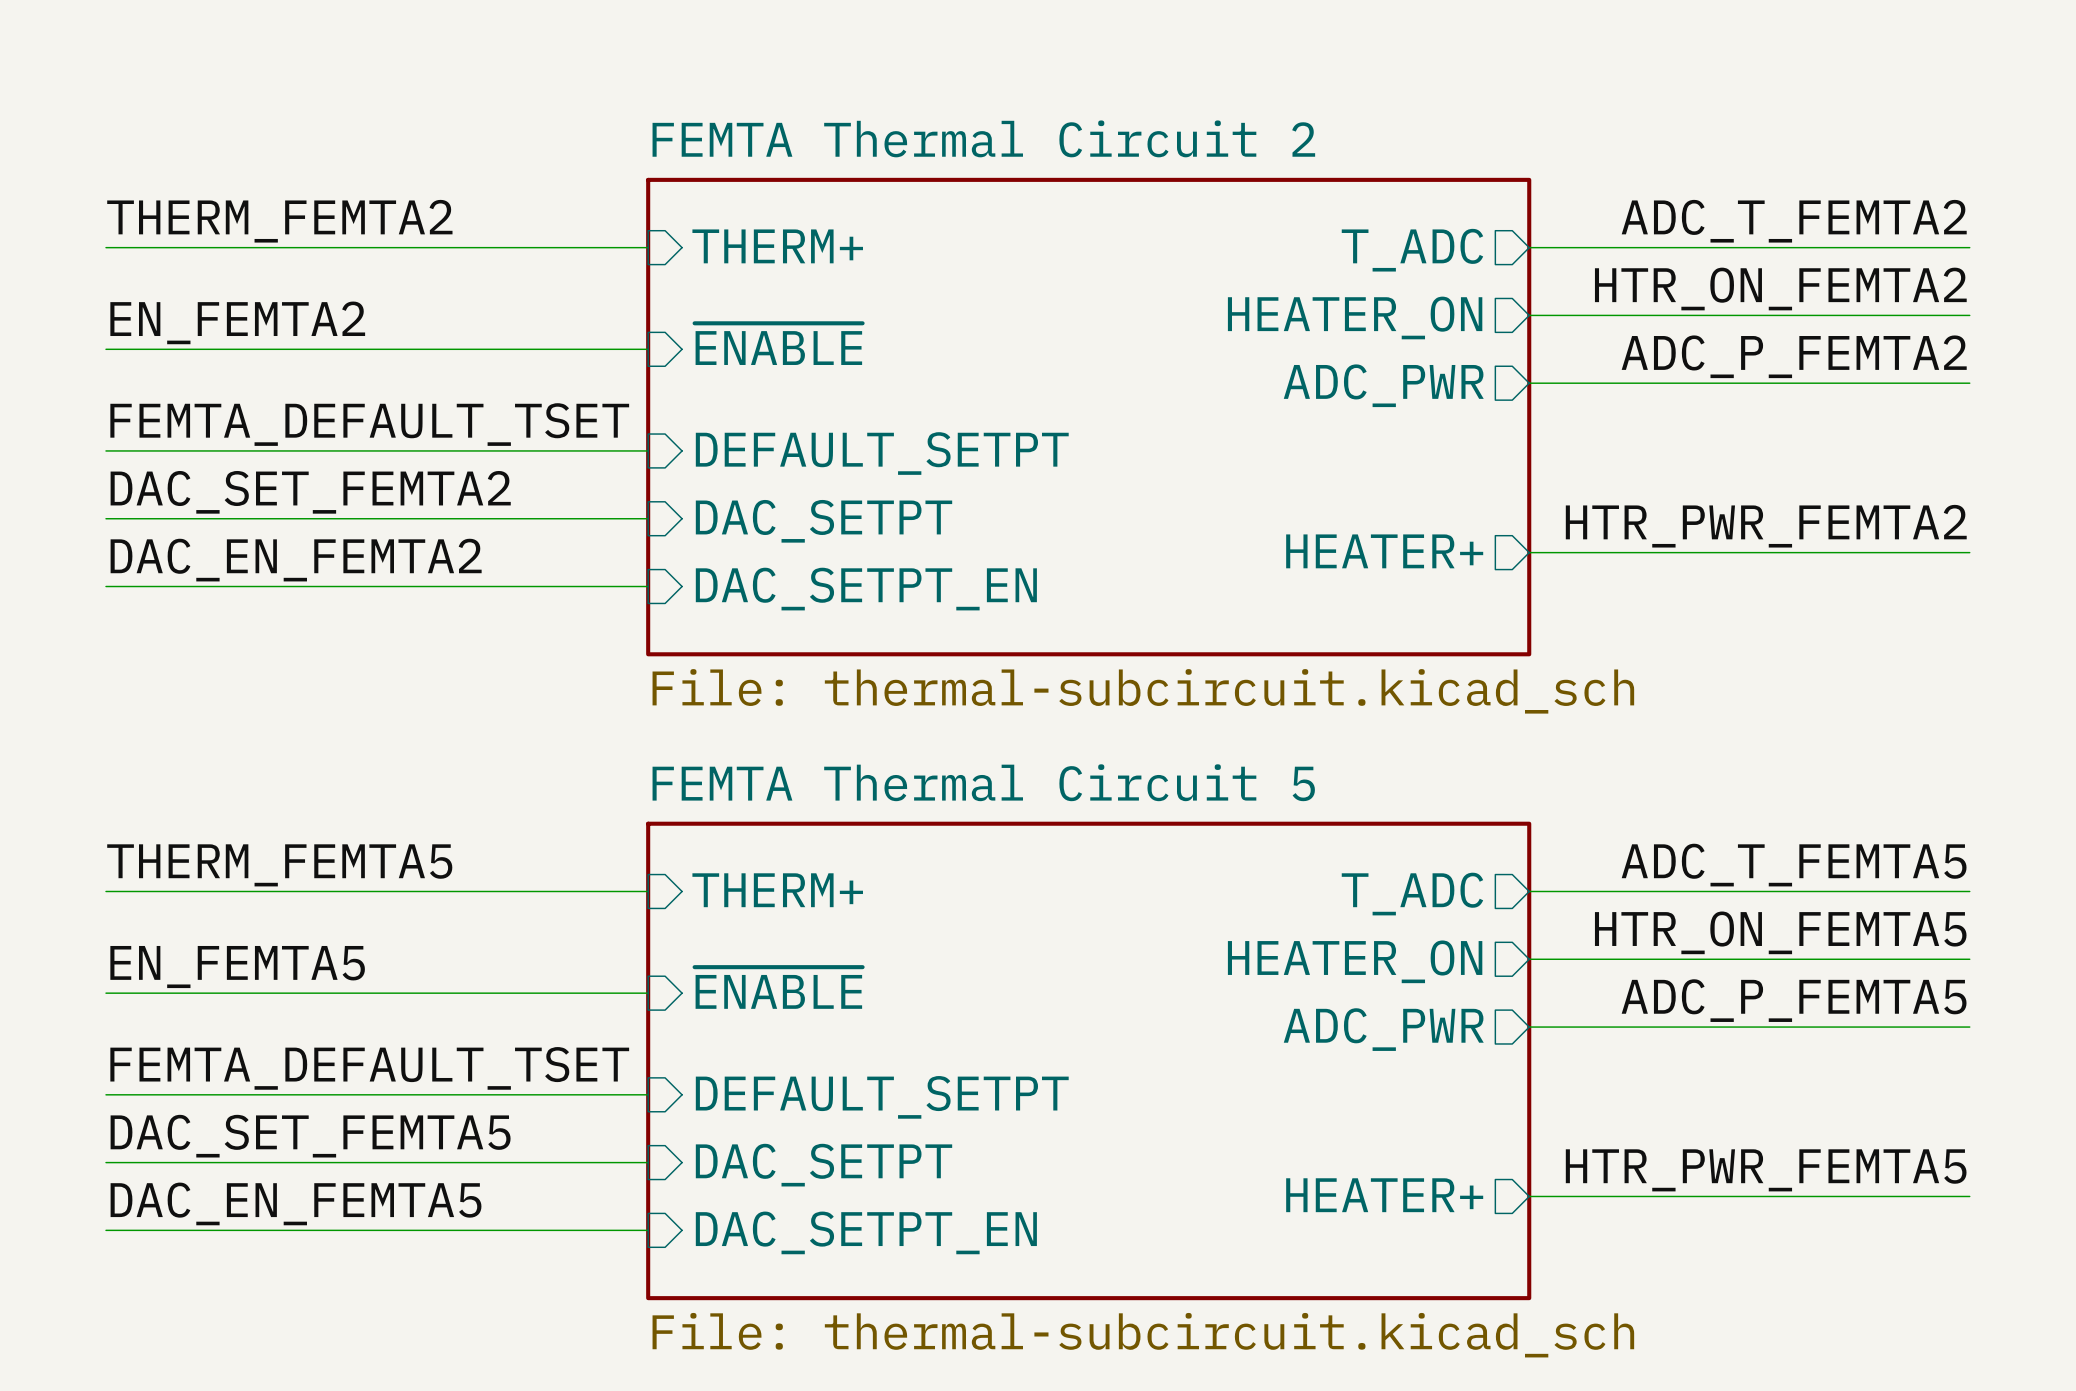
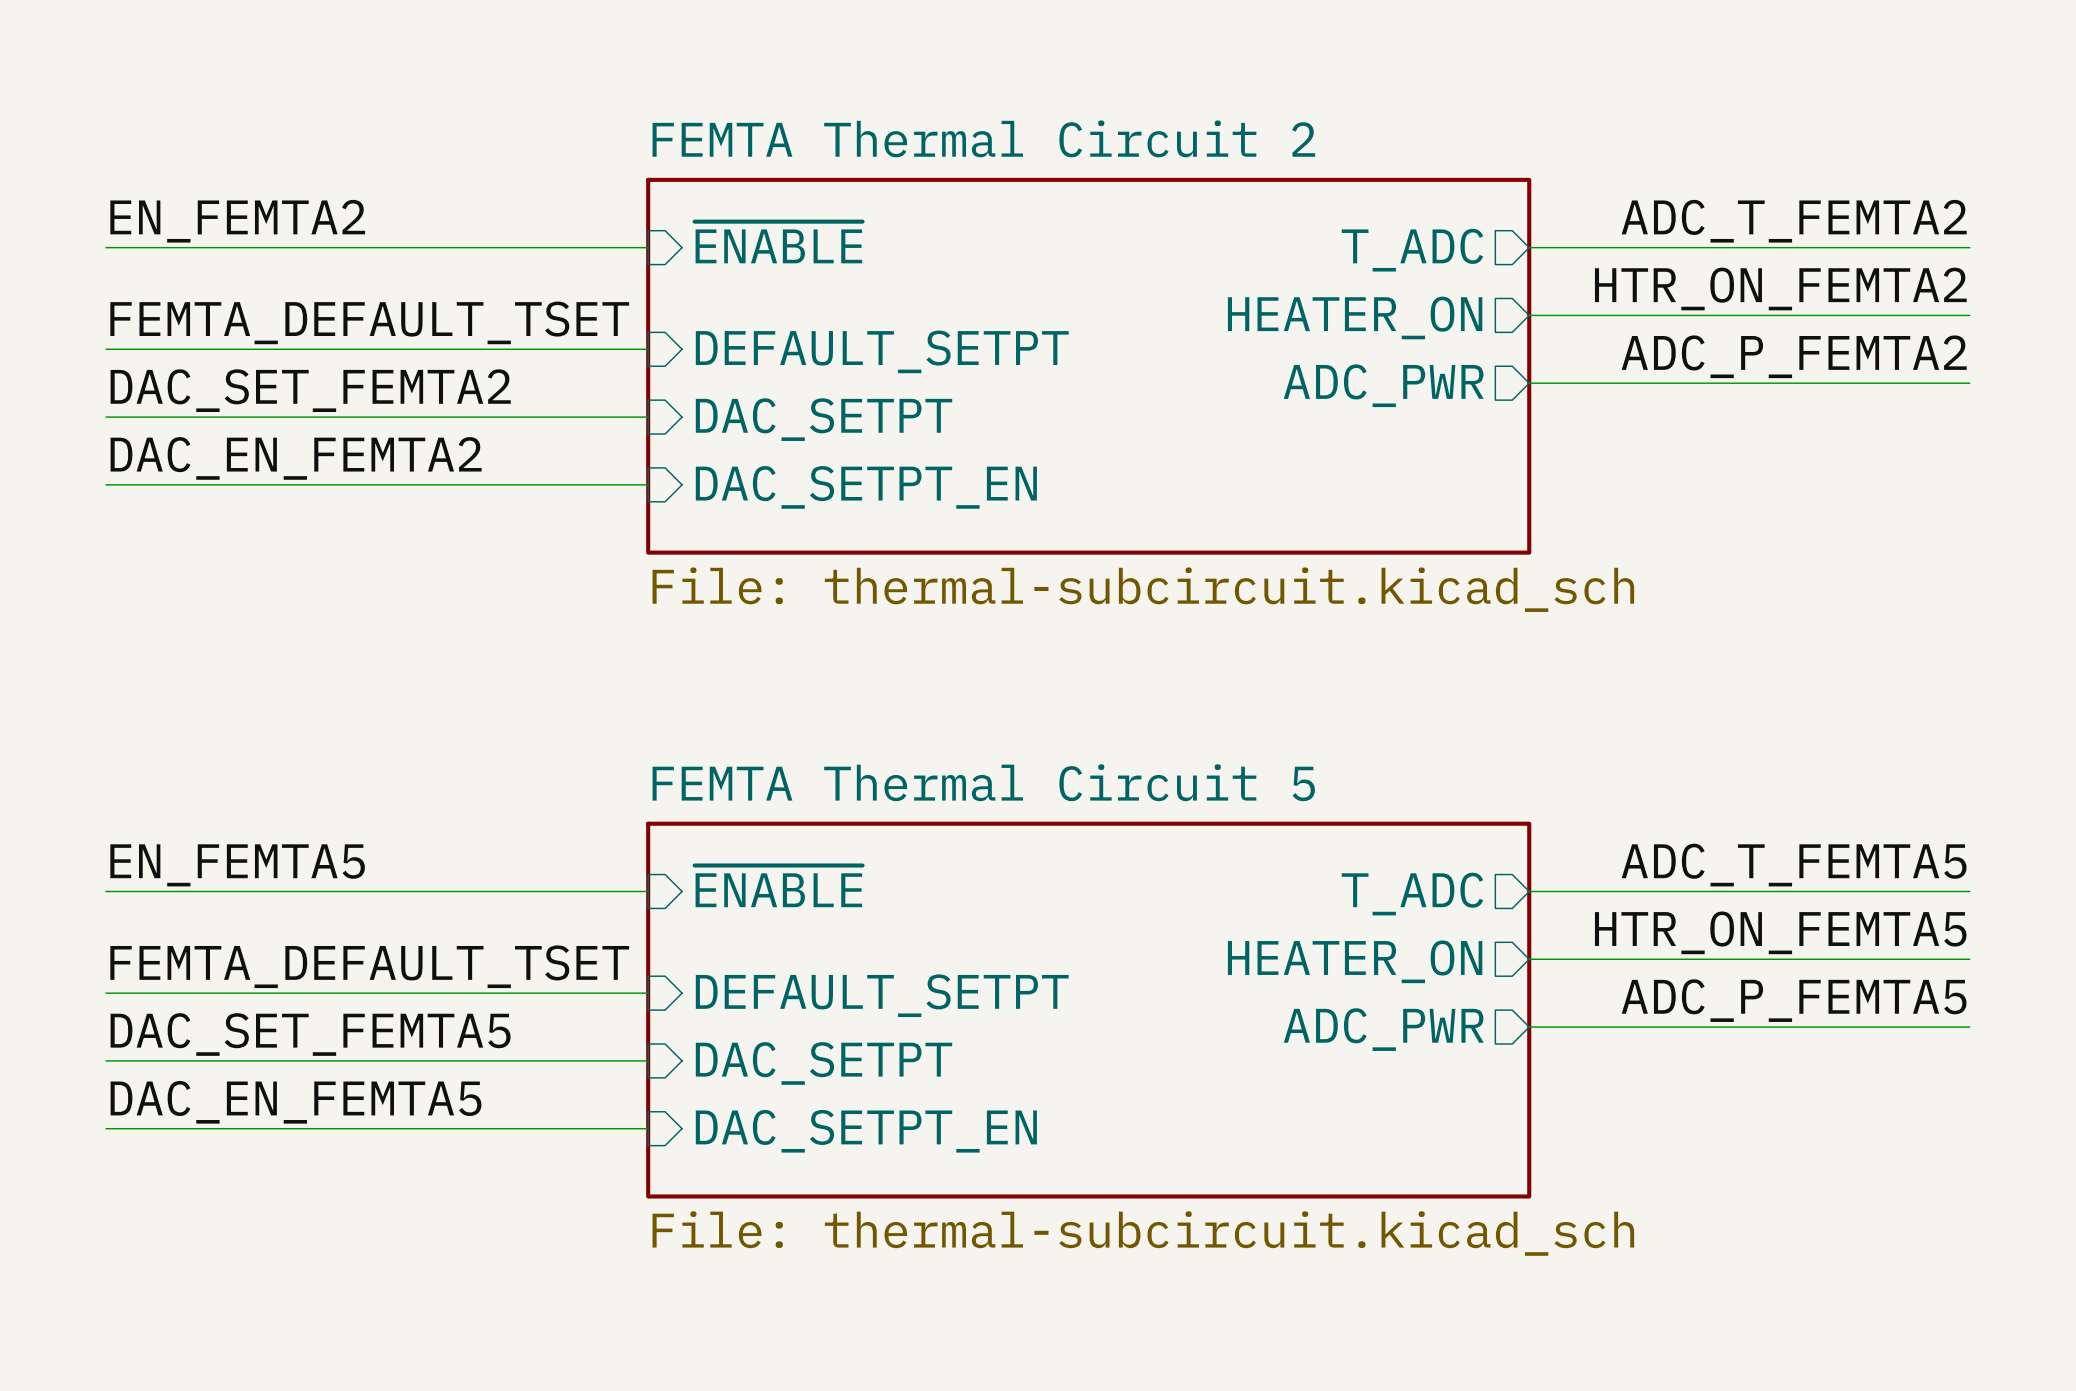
sheet FEMTA Thermal Circuit 2 shape: [646, 177, 1532, 657] -> [646, 177, 1532, 555]
label: THERM_FEMTA2 (279, 221) -> EN_FEMTA2 (237, 221)
sheet pin: THERM+ (777, 246) -> ~{ENABLE} (778, 242)
label: EN_FEMTA2 (237, 322) -> FEMTA_DEFAULT_TSET (369, 322)
sheet pin: ~{ENABLE} (778, 344) -> DEFAULT_SETPT (882, 351)
label: FEMTA_DEFAULT_TSET (369, 424) -> none
wire: (105, 450) (648, 450) -> (105, 417) (648, 417)
sheet pin: DEFAULT_SETPT (882, 453) -> none
label position: DAC_SET_FEMTA2 (310, 492) -> DAC_SET_FEMTA2 (310, 390)
wire: (105, 518) (648, 518) -> (105, 484) (648, 484)
sheet pin position: DAC_SETPT (824, 521) -> DAC_SETPT (824, 419)
label: HTR_PWR_FEMTA2 (1766, 526) -> none
sheet pin: HEATER+ (1384, 551) -> none
wire: (1529, 552) (1969, 552) -> none
label position: DAC_EN_FEMTA2 (296, 560) -> DAC_EN_FEMTA2 (296, 458)
wire: (105, 586) (648, 586) -> none
sheet pin position: DAC_SETPT_EN (866, 589) -> DAC_SETPT_EN (866, 487)
sheet FEMTA Thermal Circuit 5 shape: [646, 821, 1532, 1301] -> [646, 821, 1532, 1199]
label: THERM_FEMTA5 (279, 865) -> EN_FEMTA5 (237, 865)
sheet pin: THERM+ (777, 890) -> ~{ENABLE} (778, 886)
label: EN_FEMTA5 (237, 967) -> FEMTA_DEFAULT_TSET (369, 966)
sheet pin: ~{ENABLE} (778, 987) -> DEFAULT_SETPT (882, 995)
label: FEMTA_DEFAULT_TSET (369, 1068) -> none
wire: (105, 1094) (648, 1094) -> (105, 1060) (648, 1060)
sheet pin: DEFAULT_SETPT (882, 1097) -> none
label position: DAC_SET_FEMTA5 (310, 1136) -> DAC_SET_FEMTA5 (310, 1034)
wire: (105, 1162) (648, 1162) -> (105, 1128) (648, 1128)
sheet pin position: DAC_SETPT (824, 1165) -> DAC_SETPT (824, 1063)
label: HTR_PWR_FEMTA5 (1766, 1170) -> none
sheet pin: HEATER+ (1384, 1195) -> none
wire: (1529, 1196) (1969, 1196) -> none
label position: DAC_EN_FEMTA5 (296, 1203) -> DAC_EN_FEMTA5 (296, 1102)
wire: (105, 1230) (648, 1230) -> none
sheet pin position: DAC_SETPT_EN (866, 1232) -> DAC_SETPT_EN (866, 1131)

